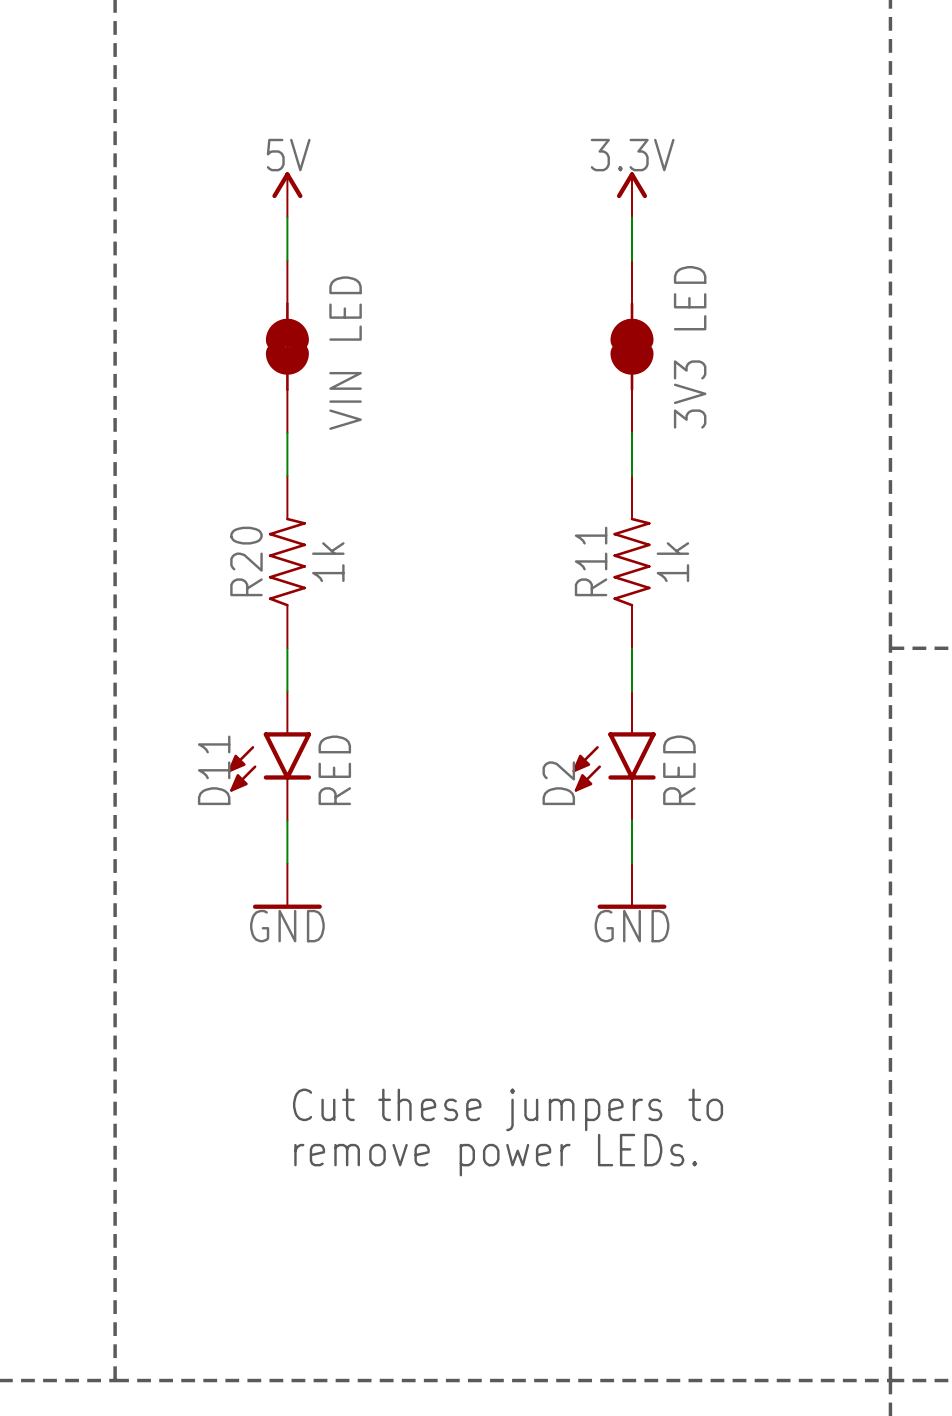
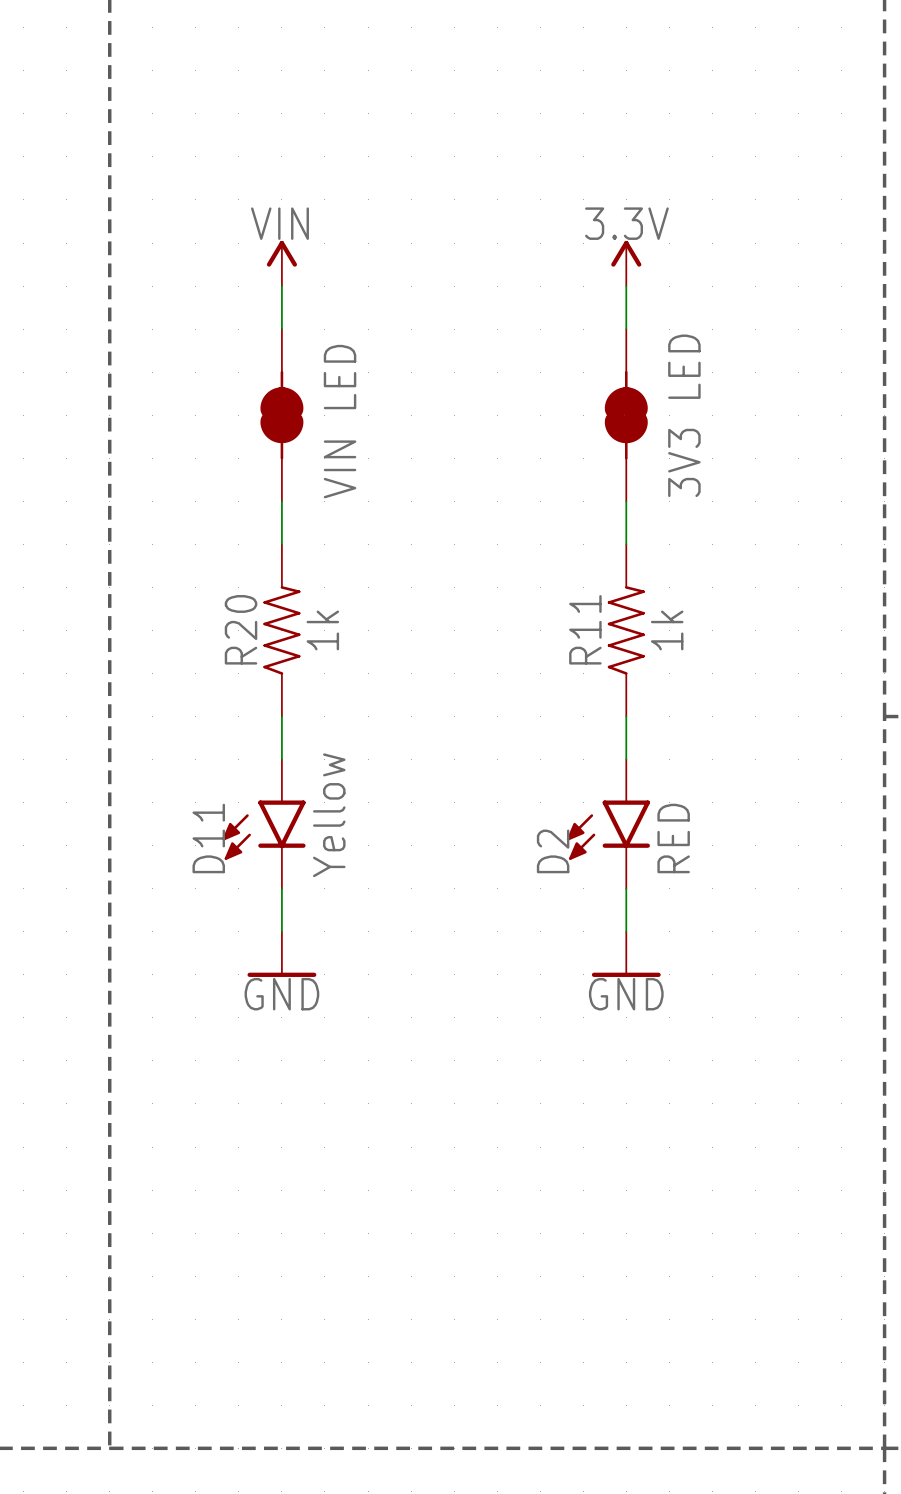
power symbol: 5V (287, 194) -> VIN (281, 263)
D11 value: RED (334, 770) -> Yellow (329, 815)
text: Cut these jumpers to (508, 1109) -> none
text: remove power LEDs. (495, 1155) -> none

